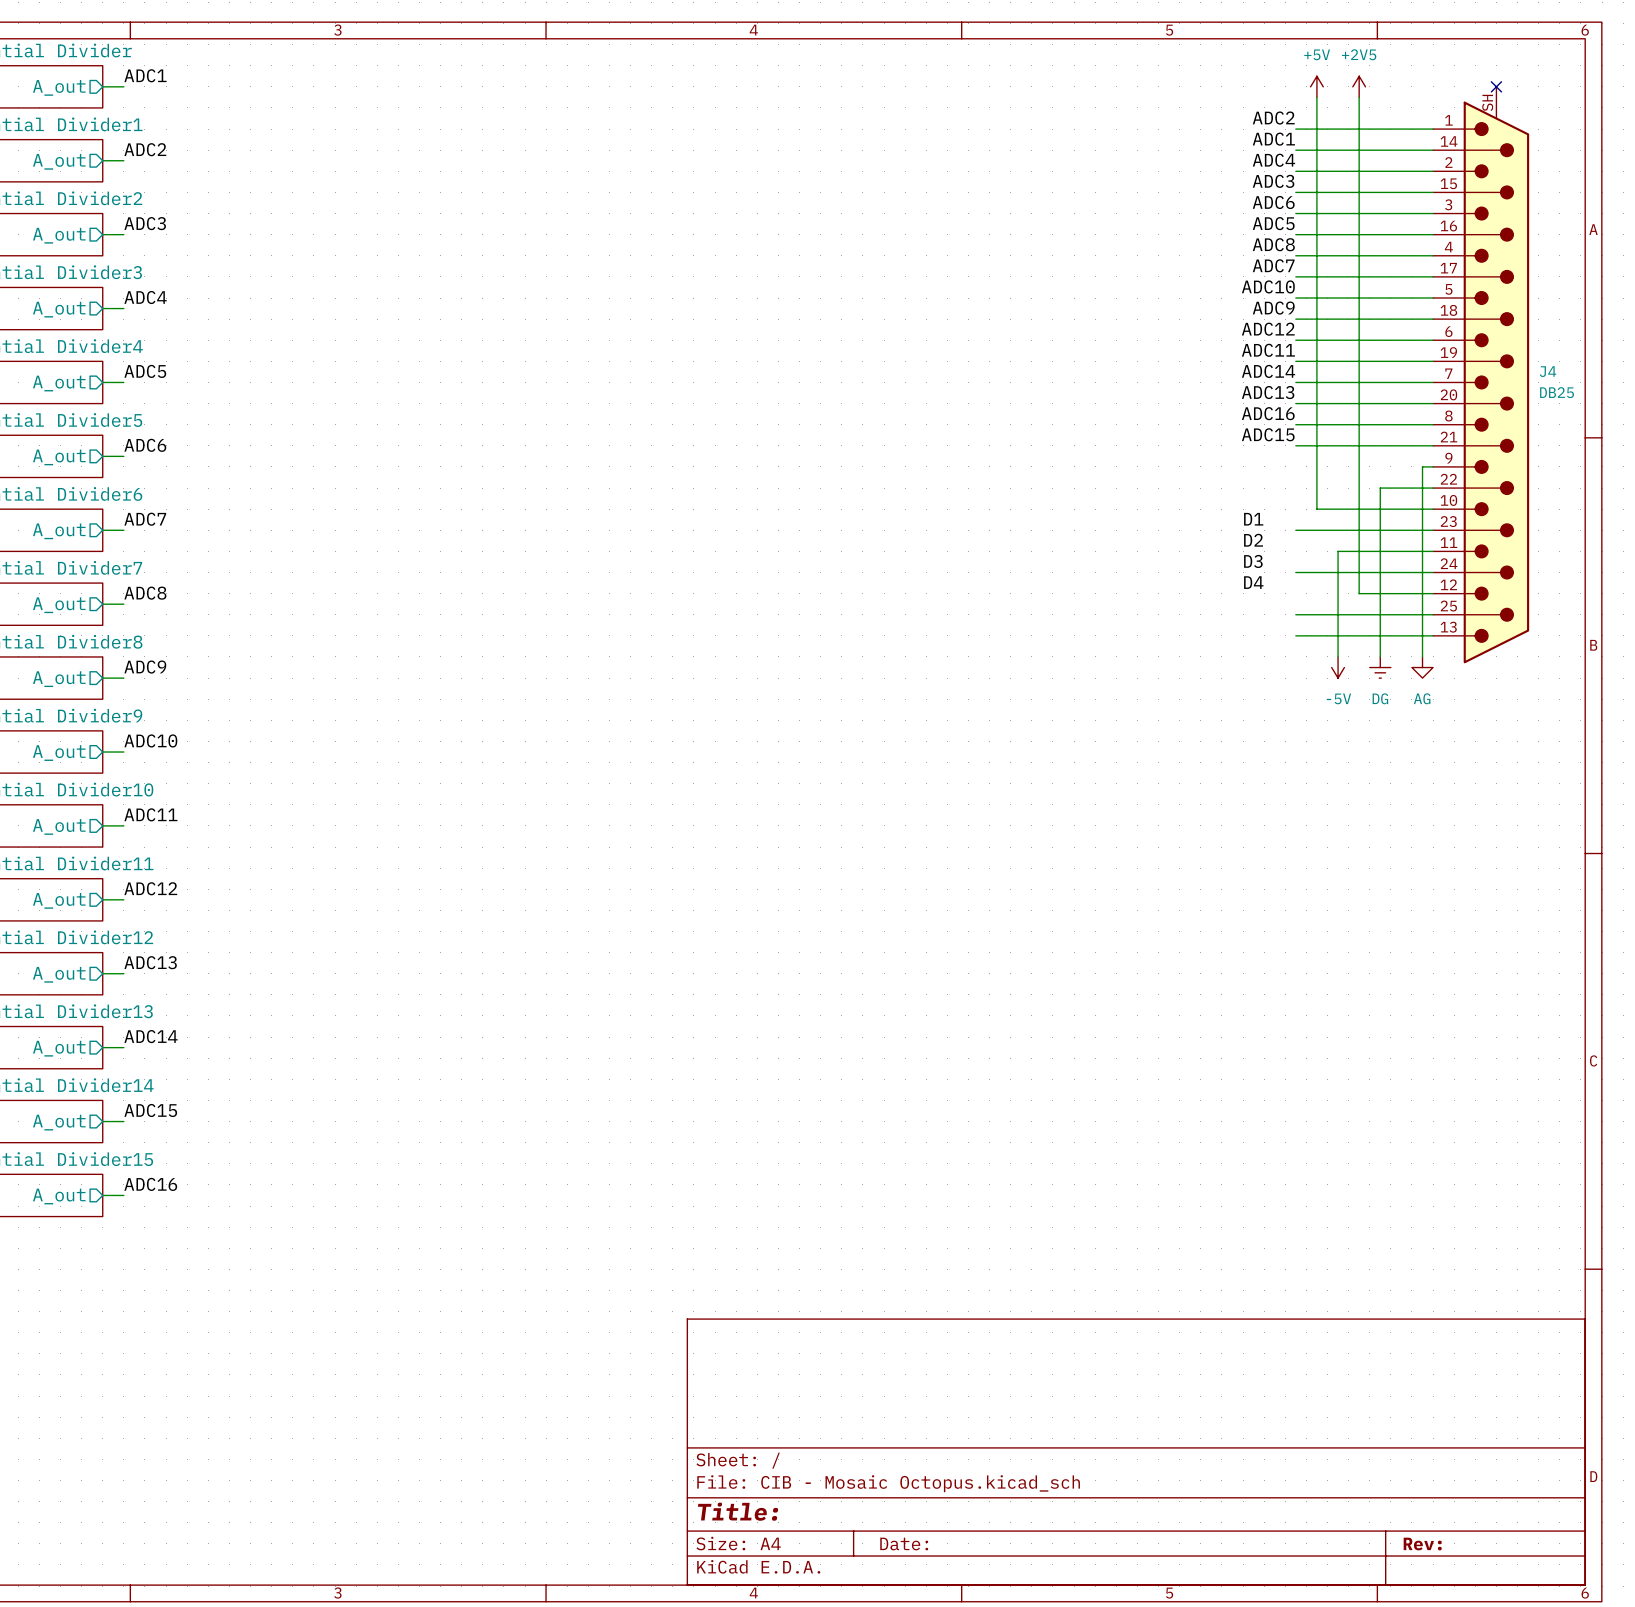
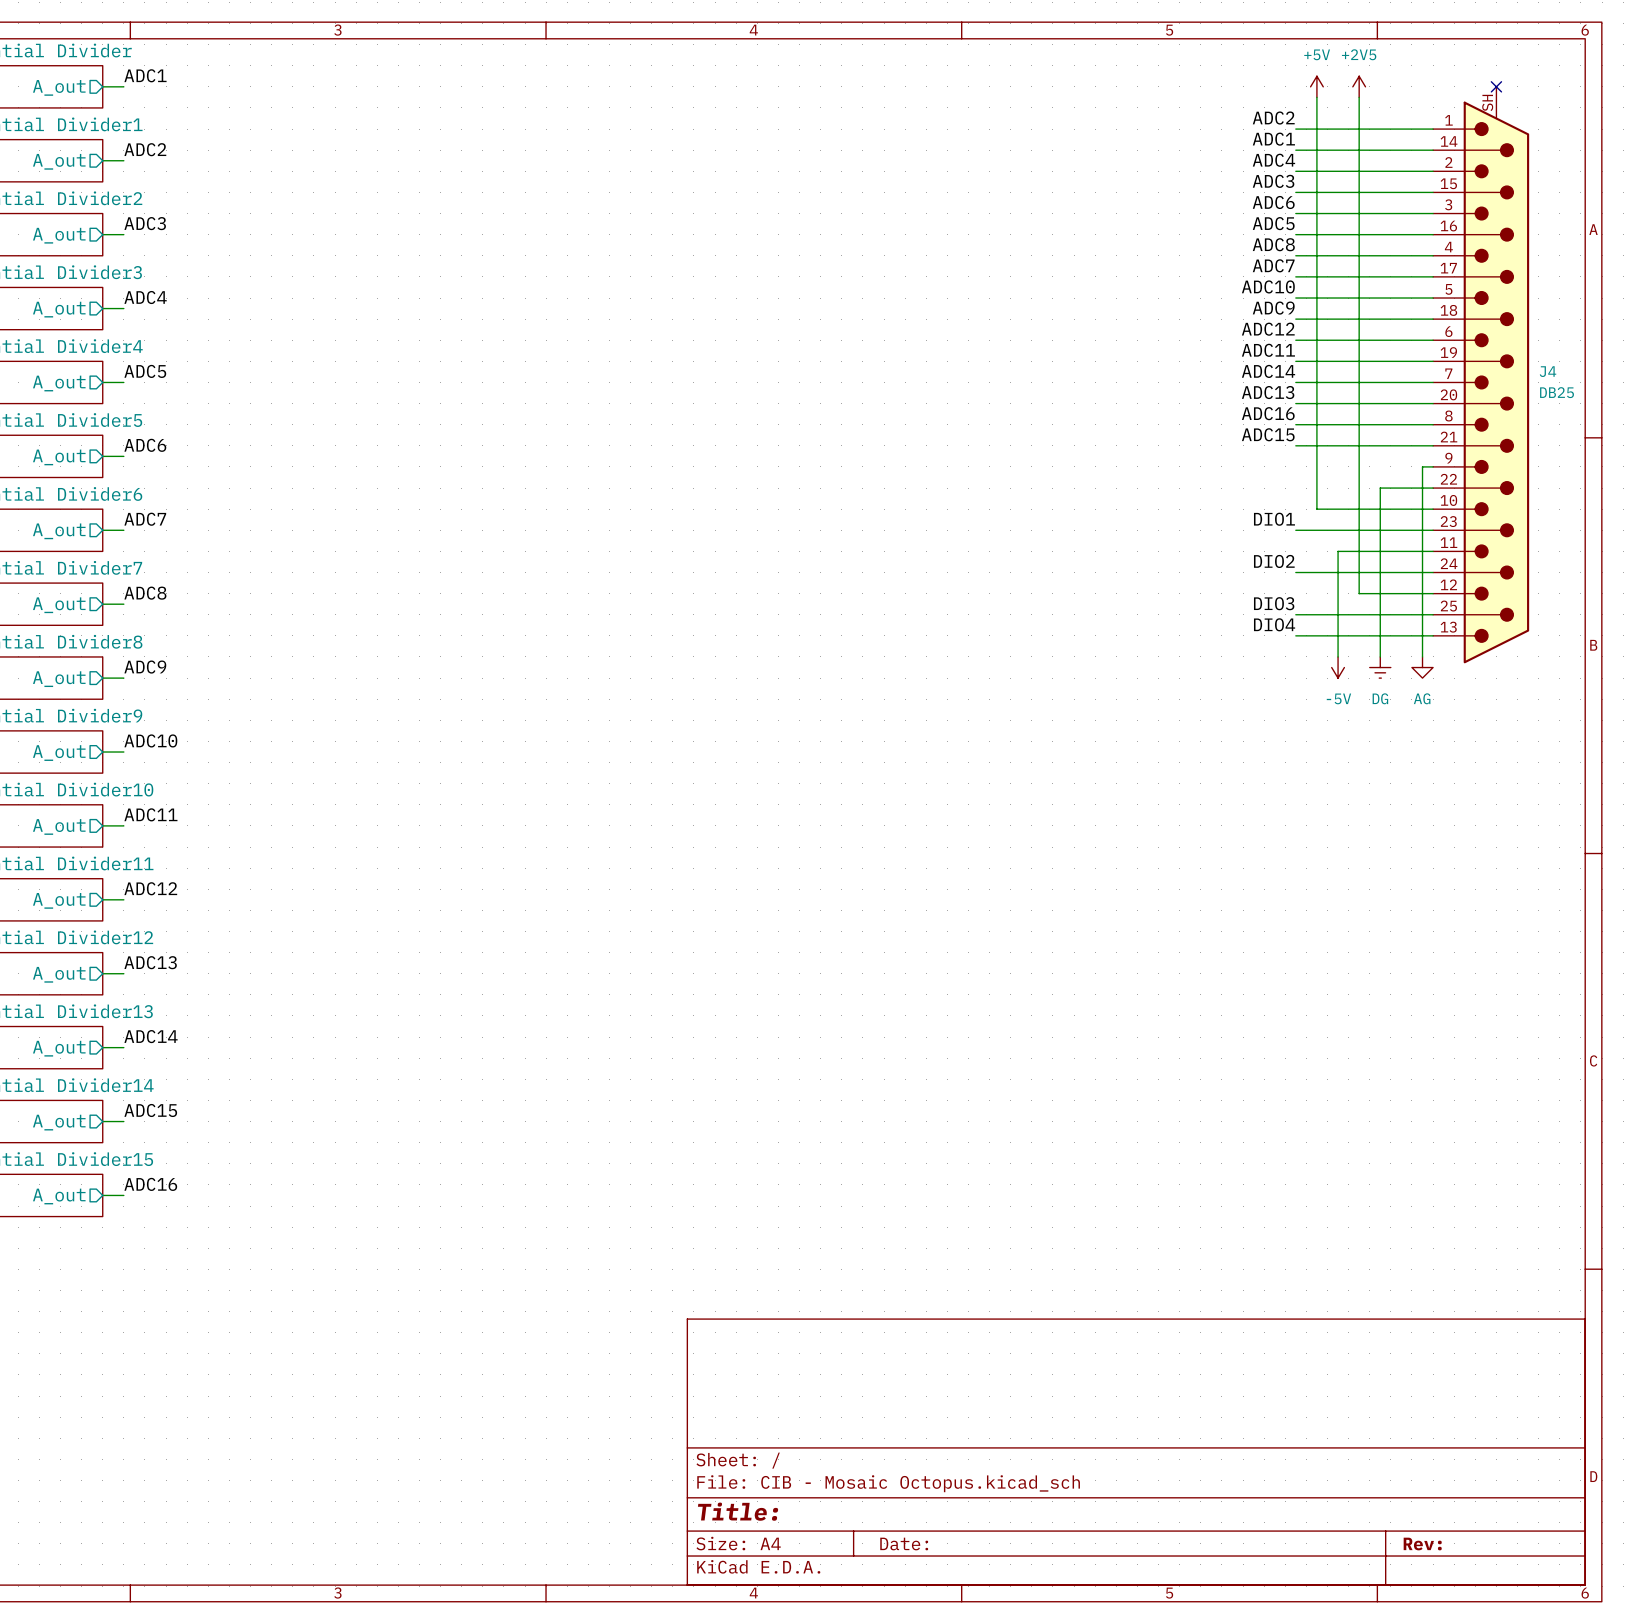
label: D1 (1253, 519) -> DIO1 (1274, 519)
label: D2 (1253, 540) -> DIO2 (1274, 561)
label: D3 (1253, 561) -> none
label: D4 (1253, 582) -> none
label: none -> DIO3 (1274, 603)
label: none -> DIO4 (1274, 624)

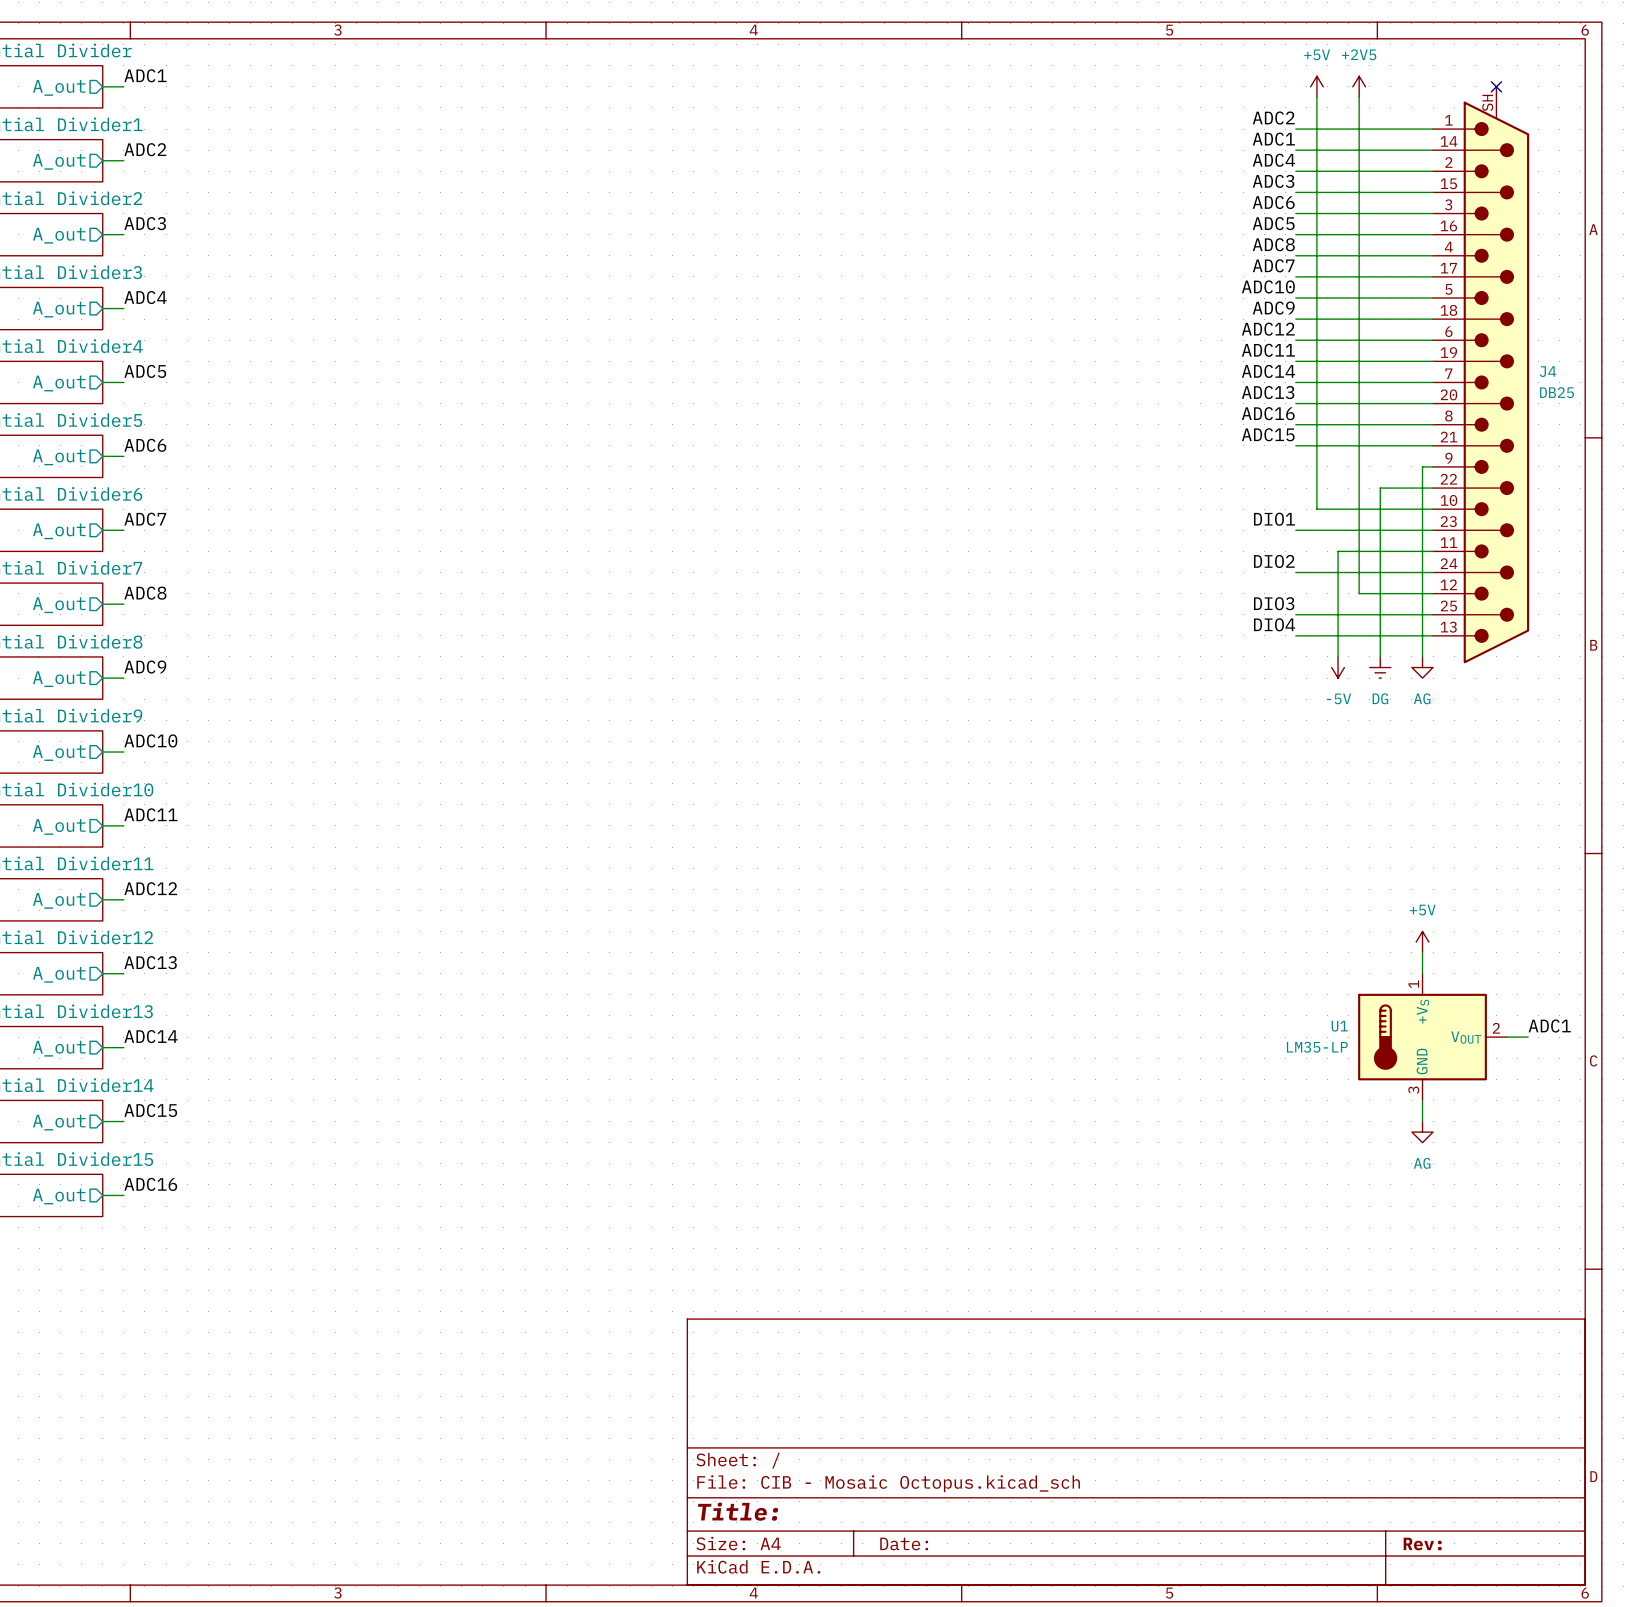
power symbol: none -> +5V (1422, 942)
wire: none -> (1422, 952) (1422, 973)
label: none -> ADC1 (1549, 1026)
U1: none -> LM35-LP (1432, 1037)
wire: none -> (1506, 1037) (1528, 1037)
wire: none -> (1422, 1100) (1422, 1121)
power symbol: none -> AG (1422, 1132)

